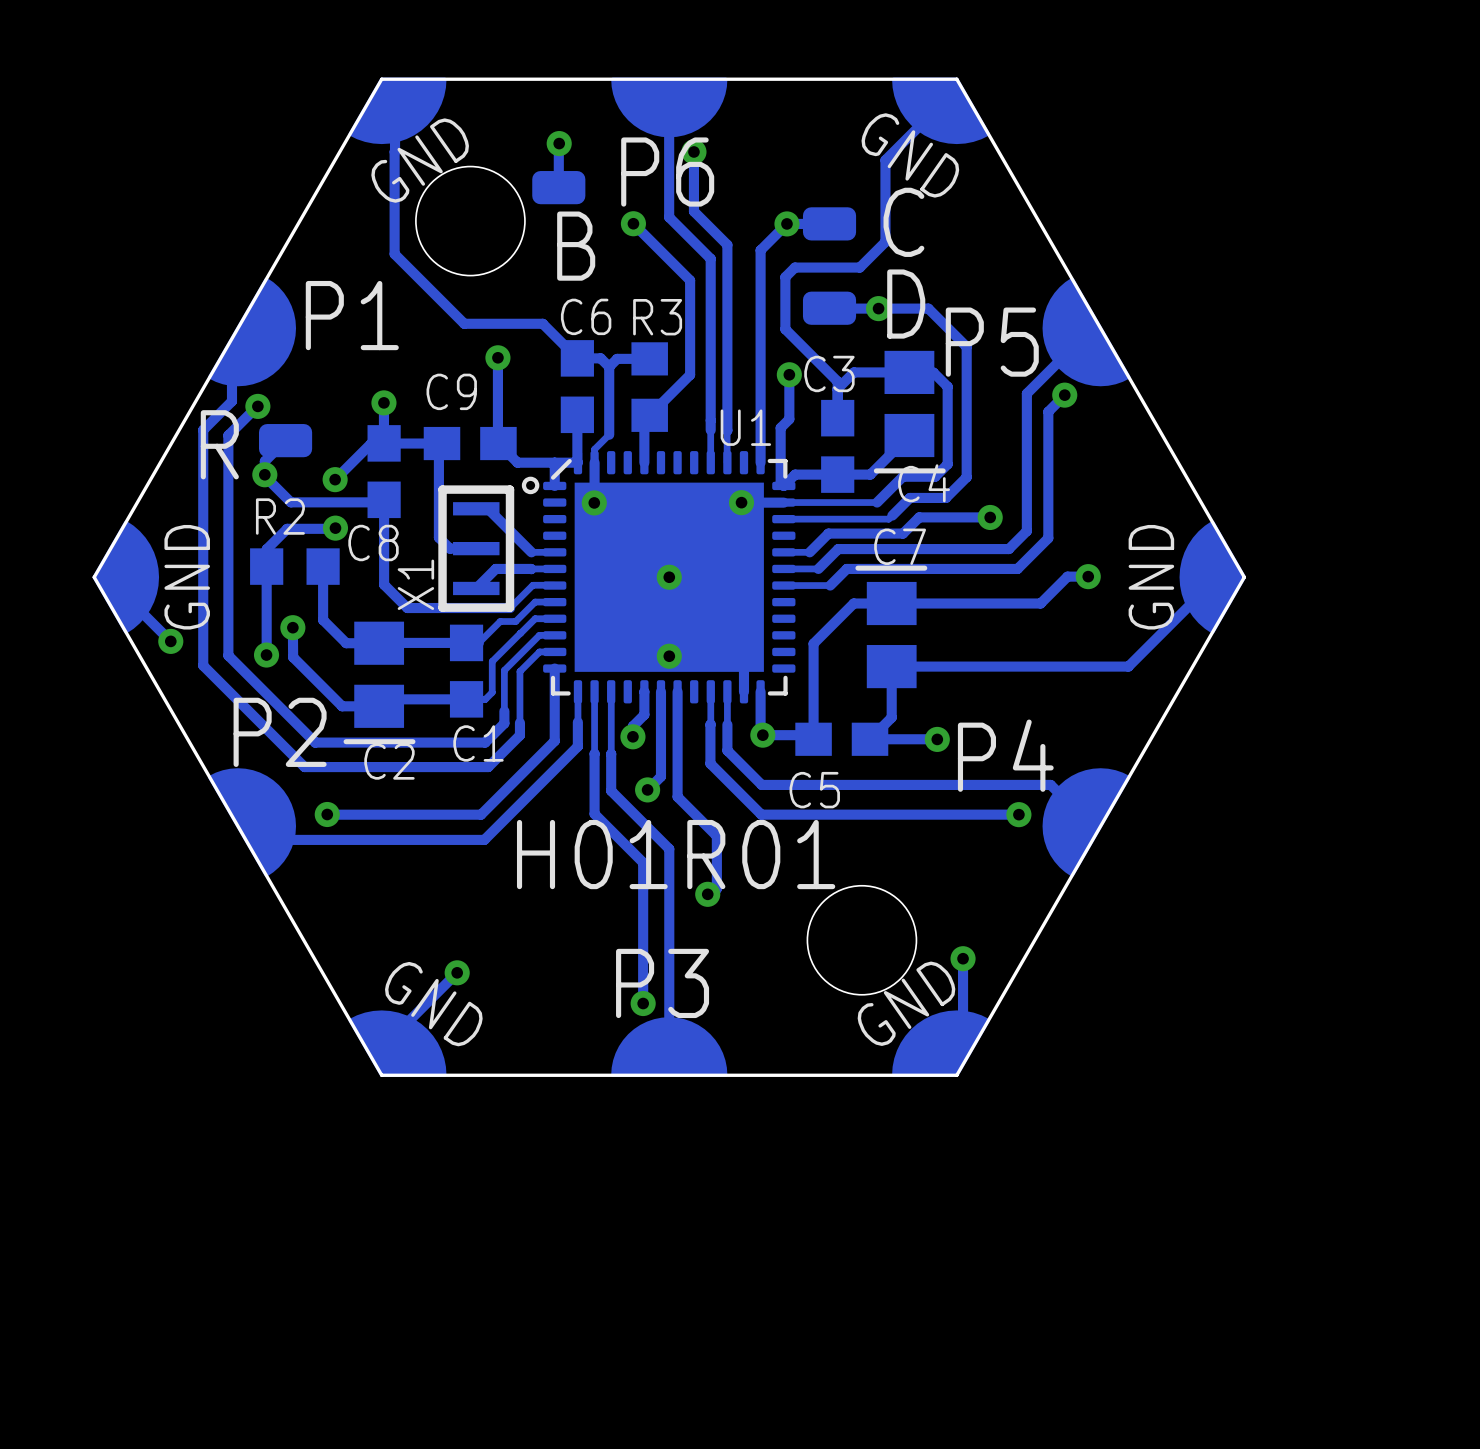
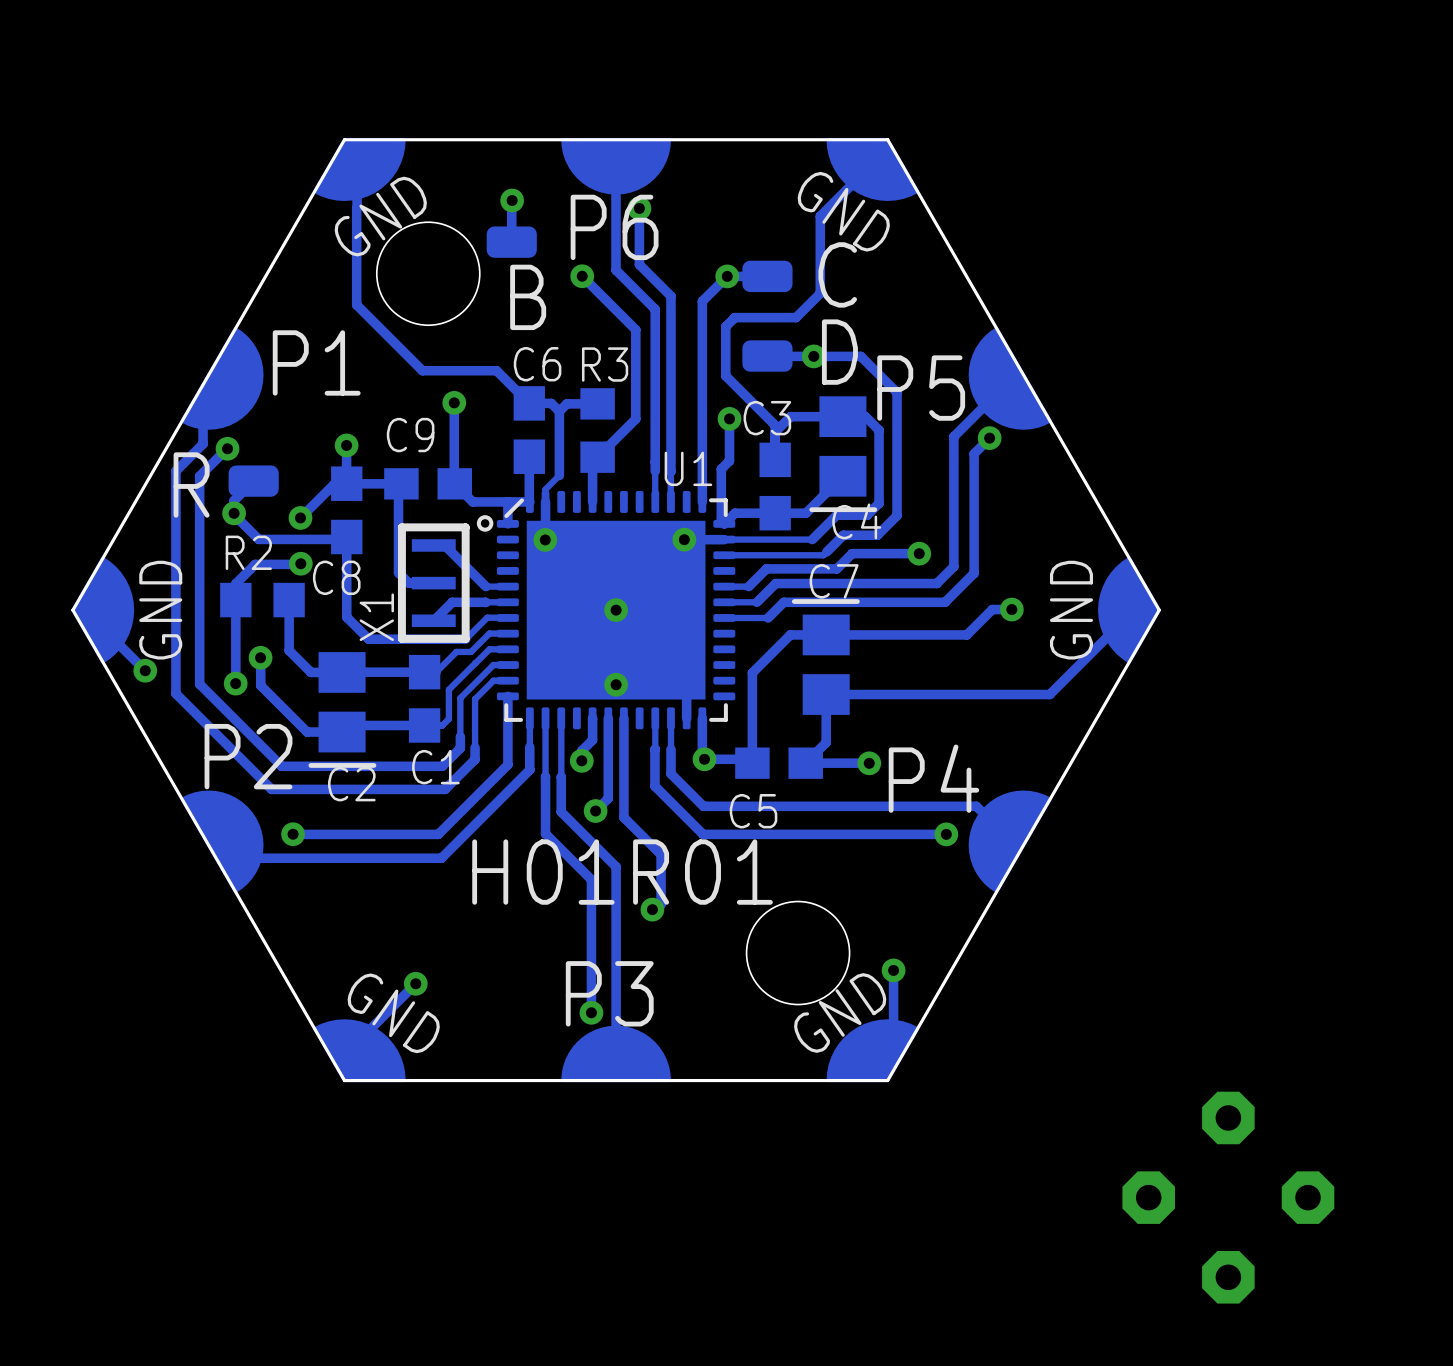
part: none -> (1228, 1197)

